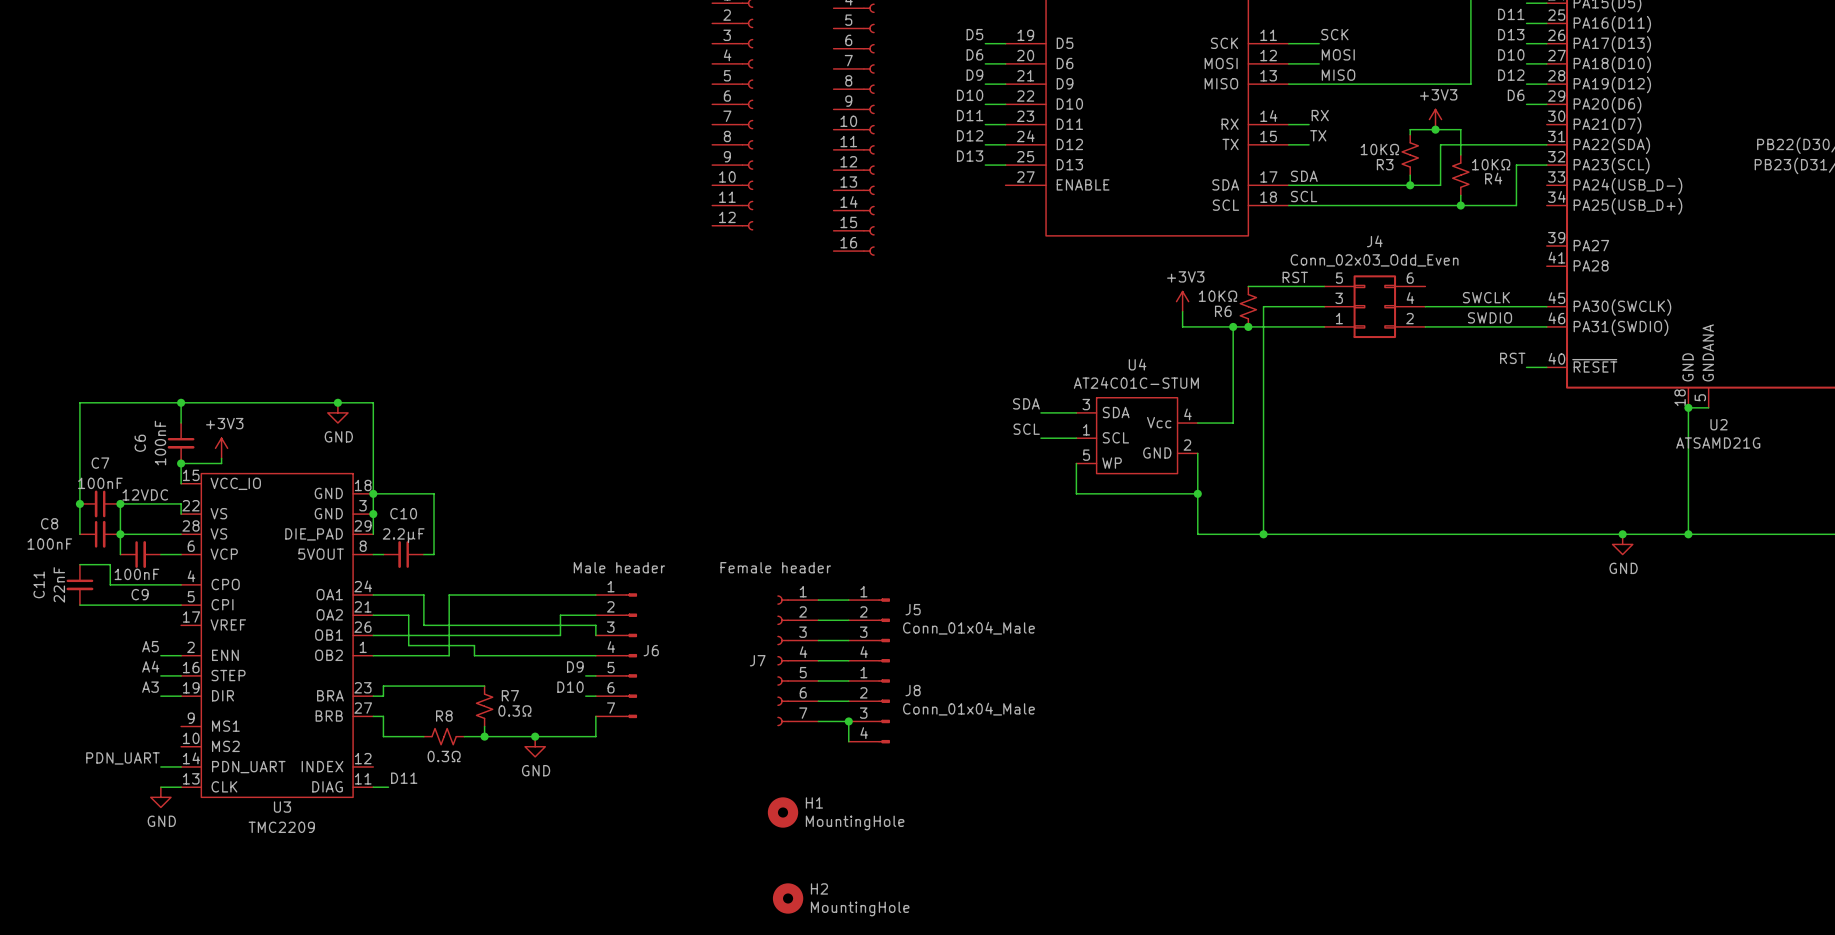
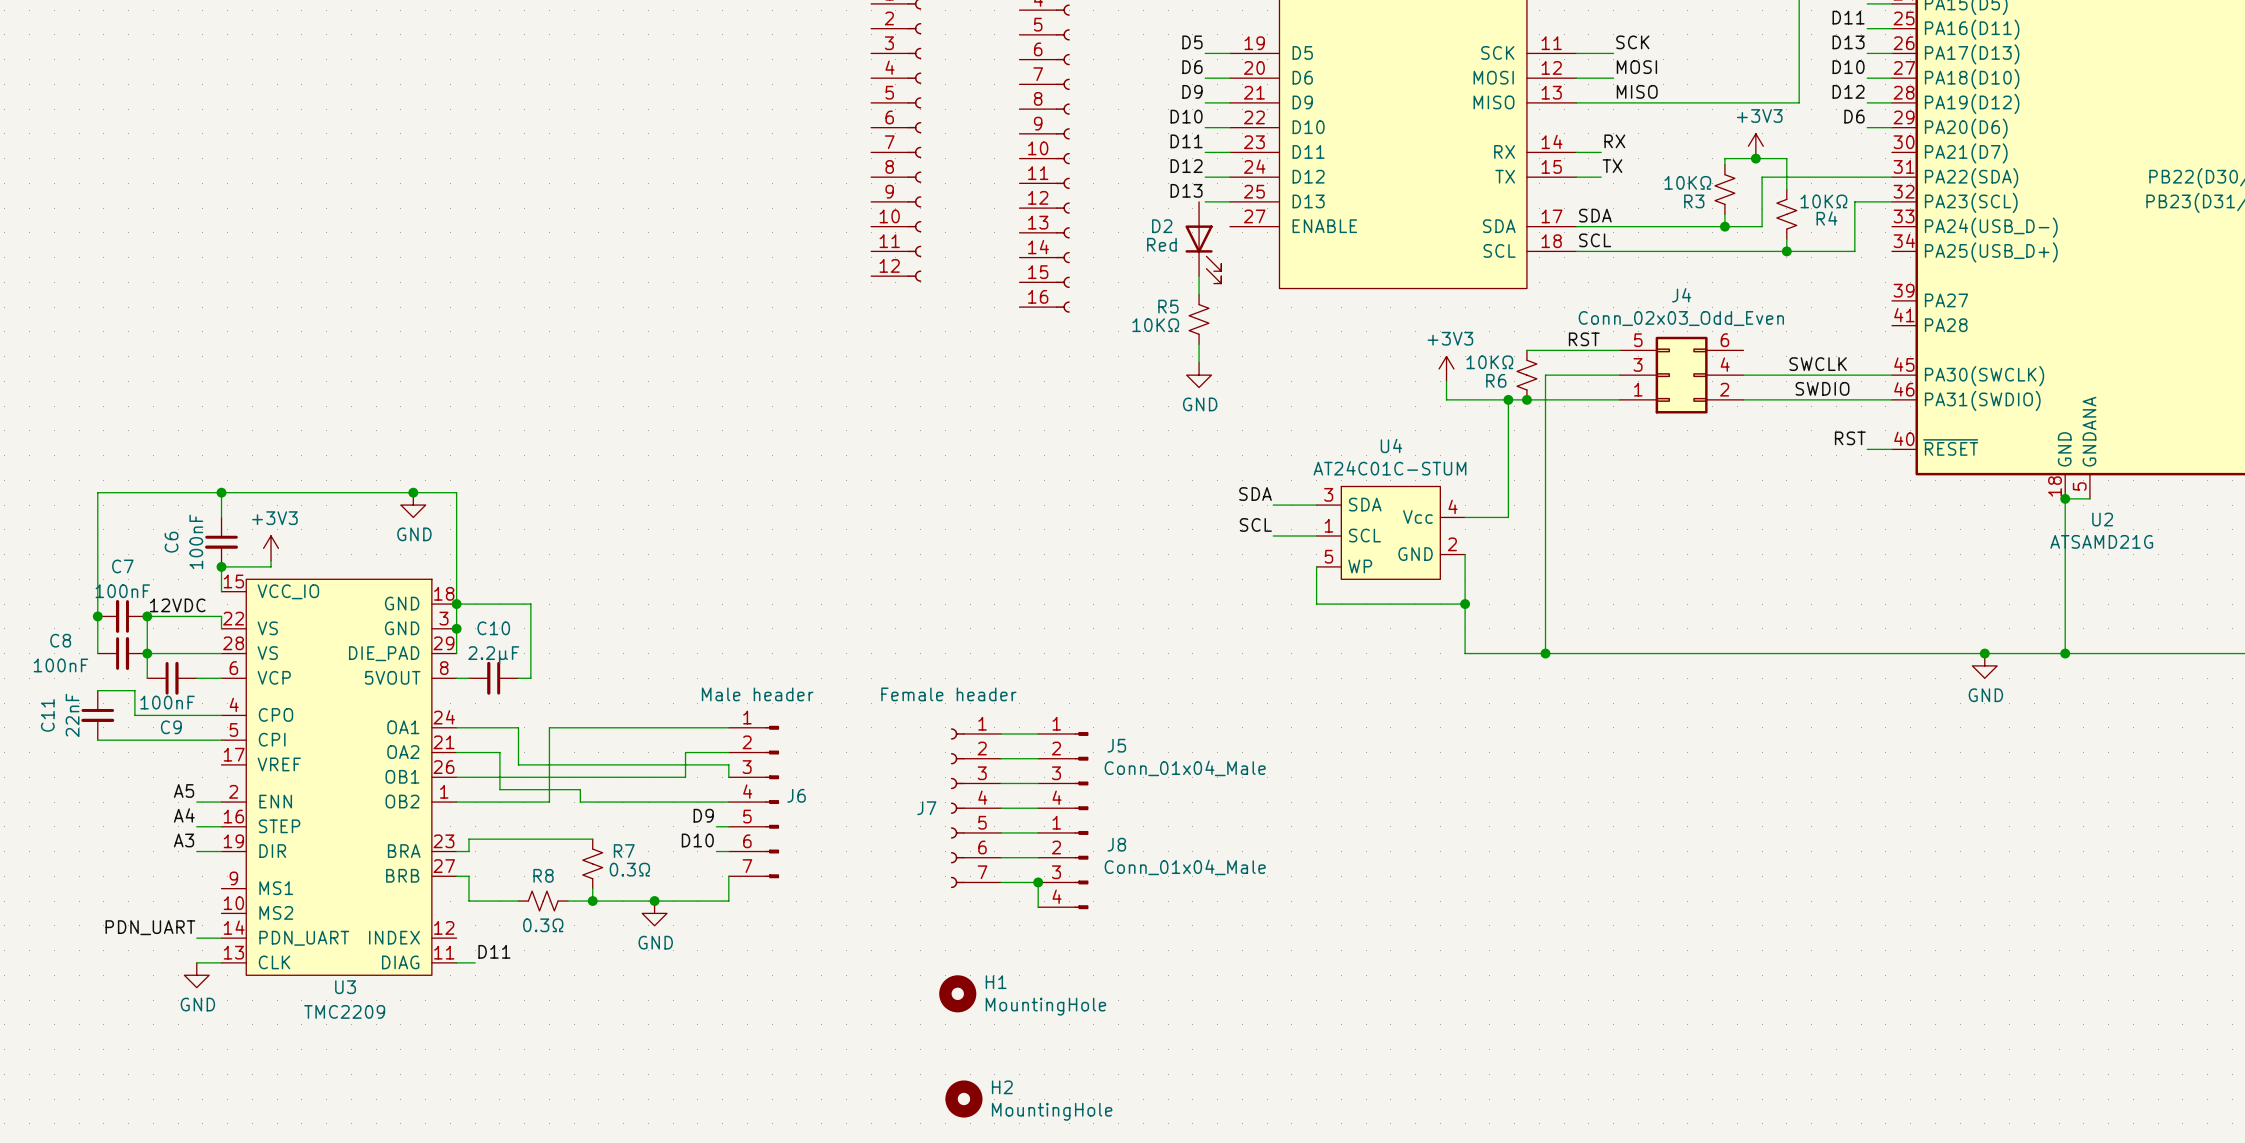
D2: none -> Red (1203, 242)
wire: none -> (1199, 276) (1199, 294)
R5: none -> 10KΩ (1199, 319)
wire: none -> (1199, 344) (1199, 362)
power symbol: none -> GND (1199, 375)

